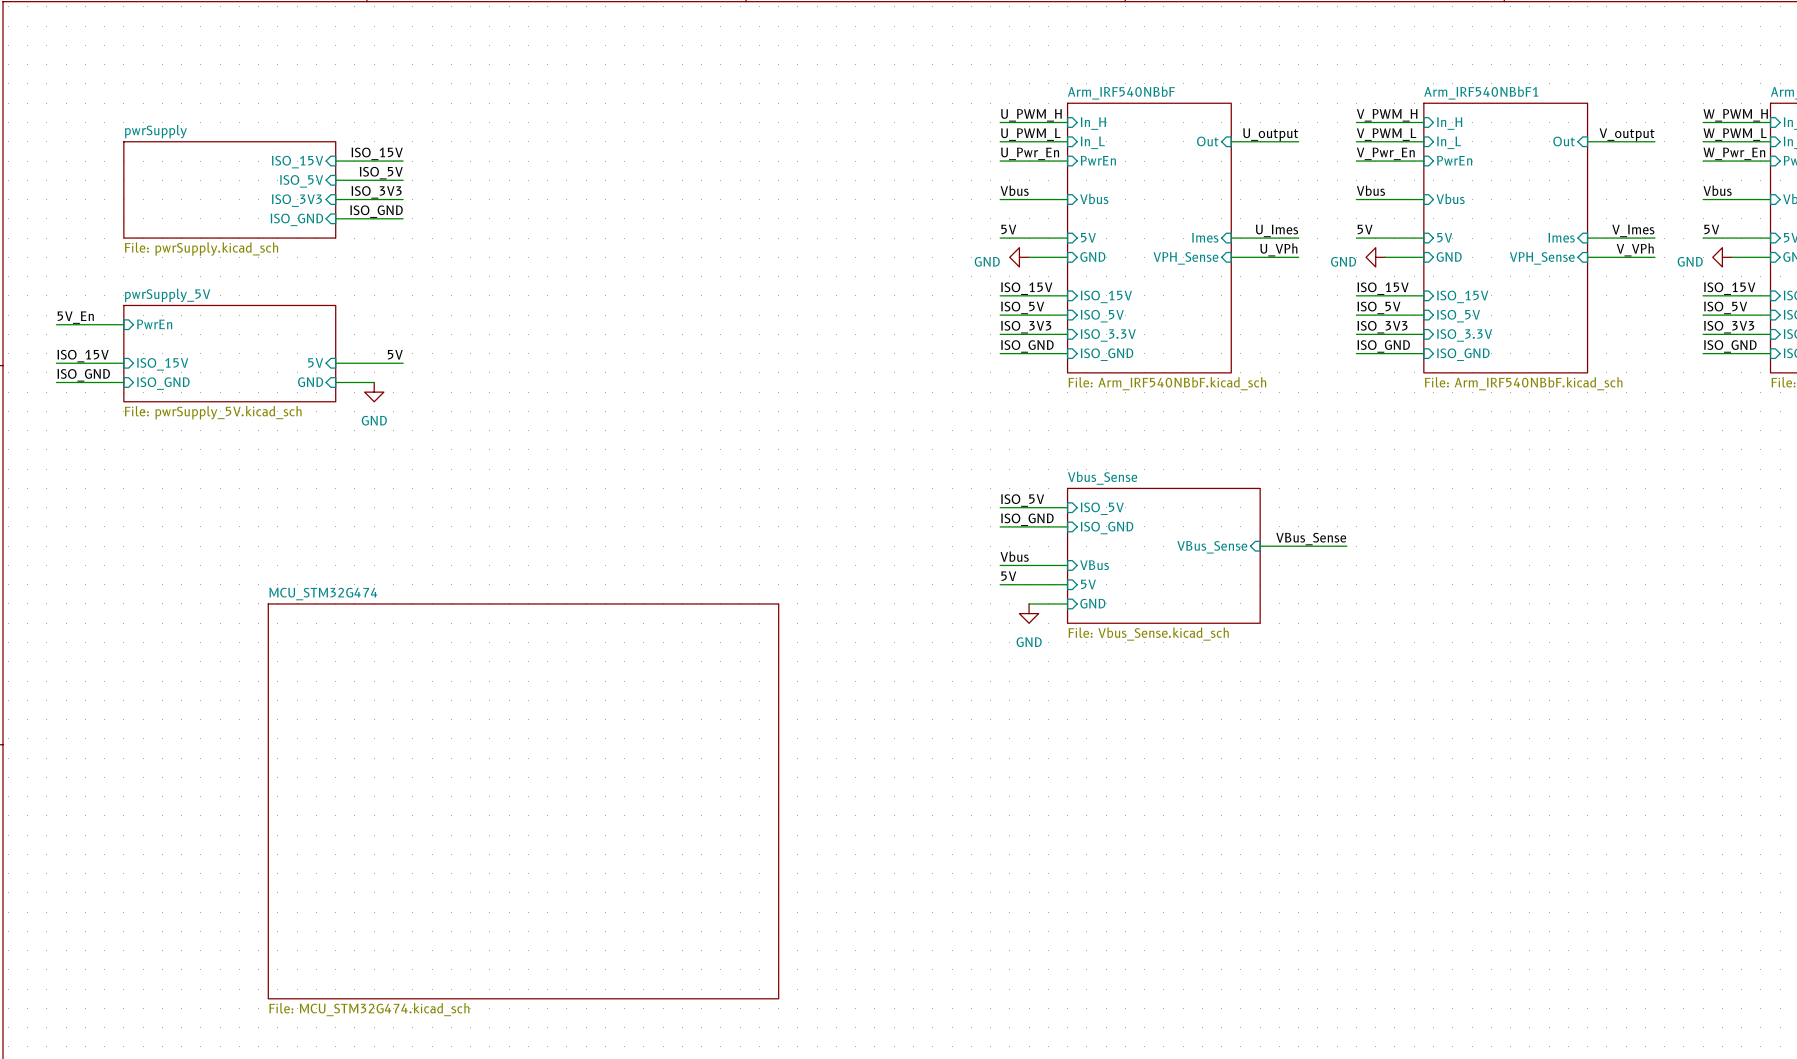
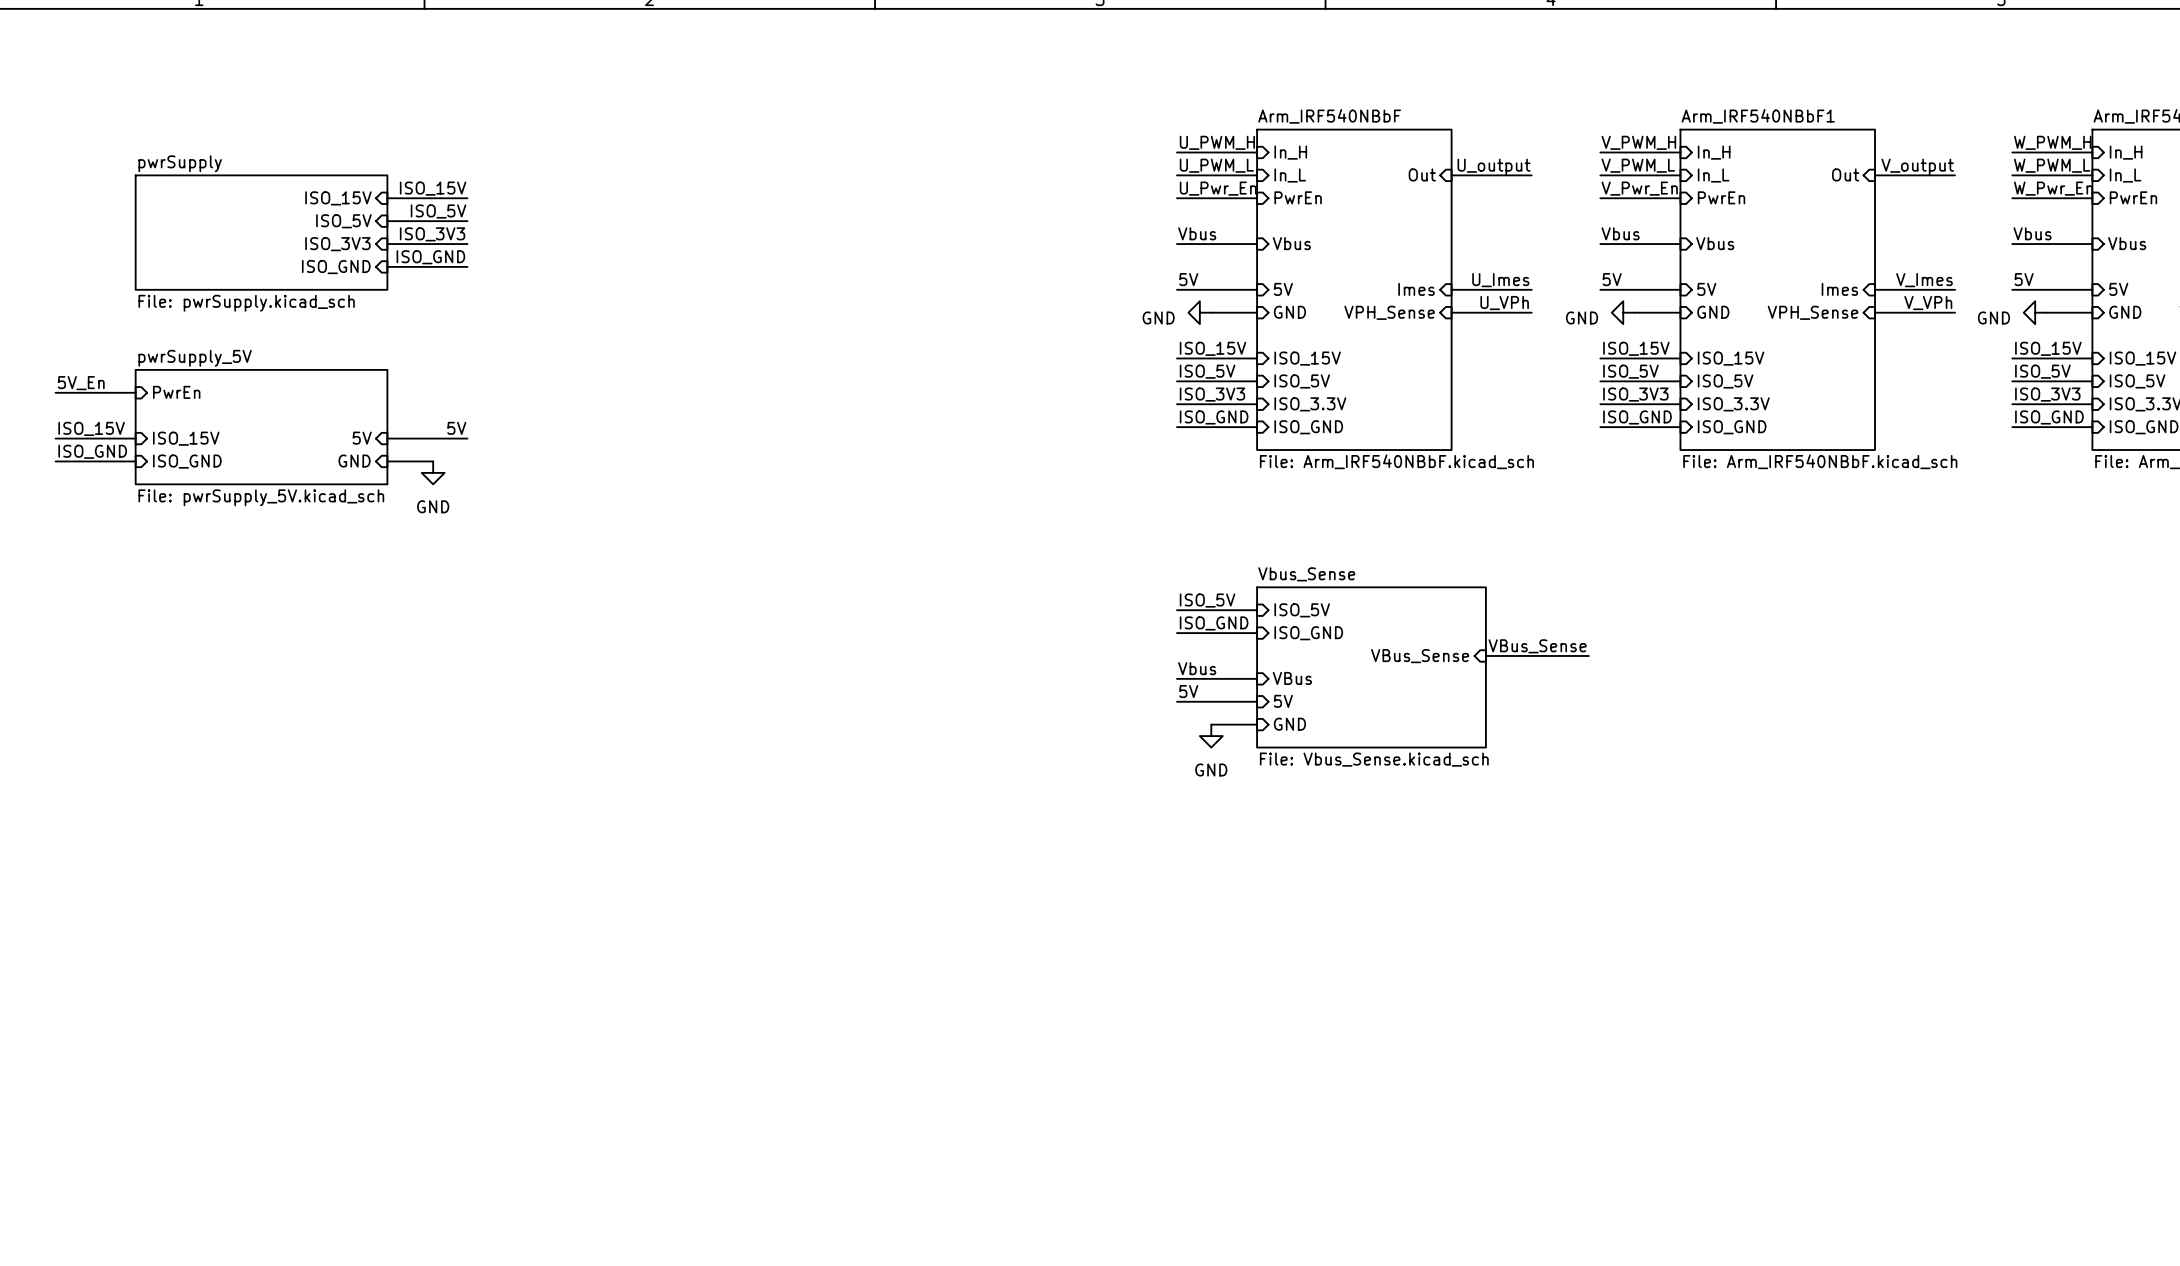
sheet MCU_STM32G474: File: MCU_STM32G474.kicad_sch (523, 801) -> none

